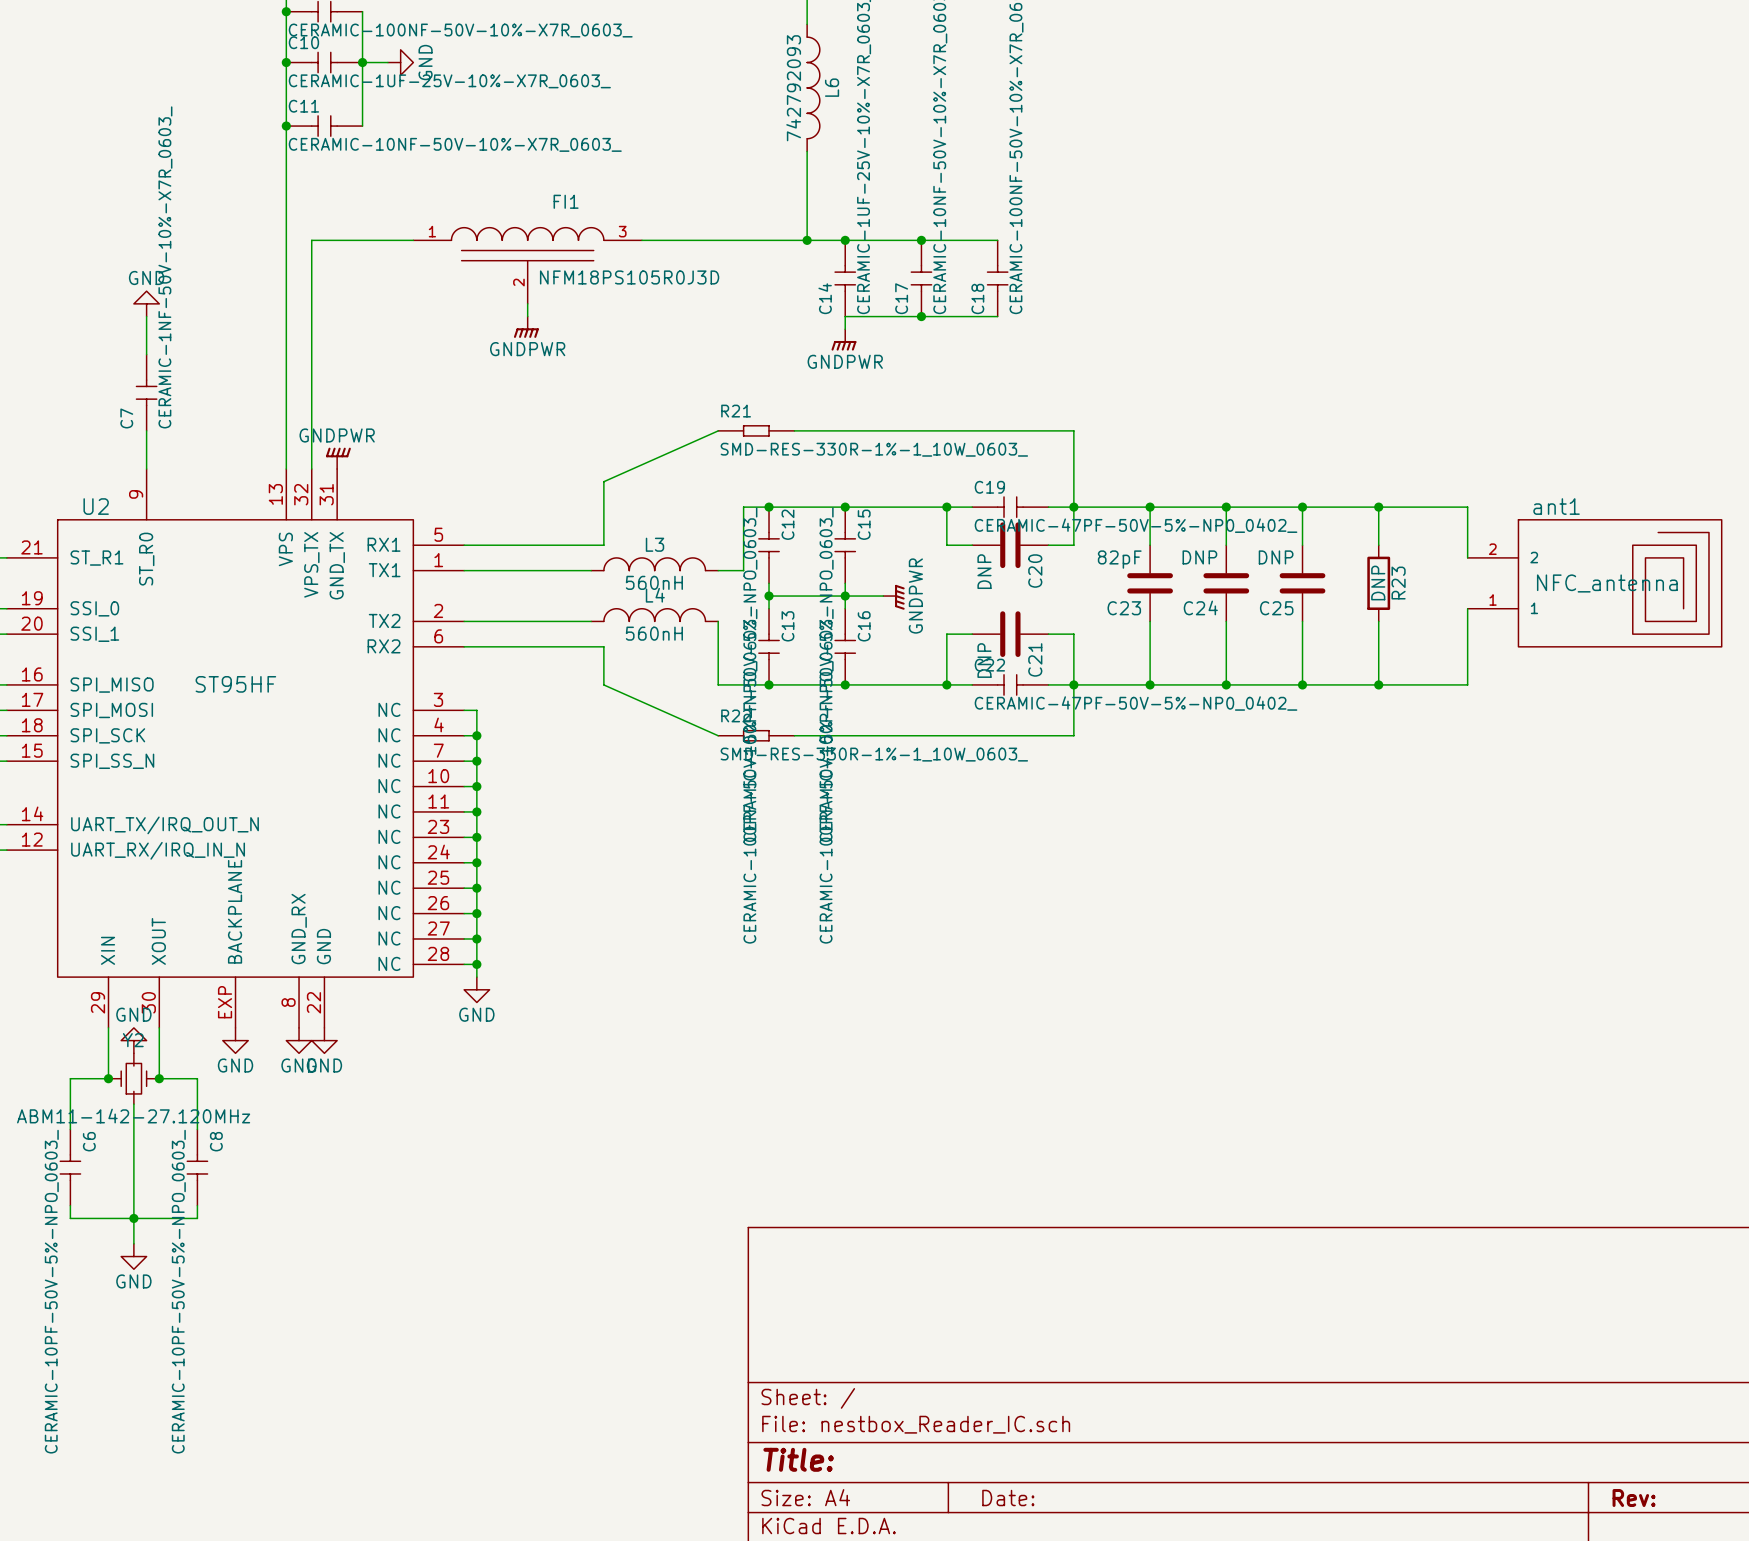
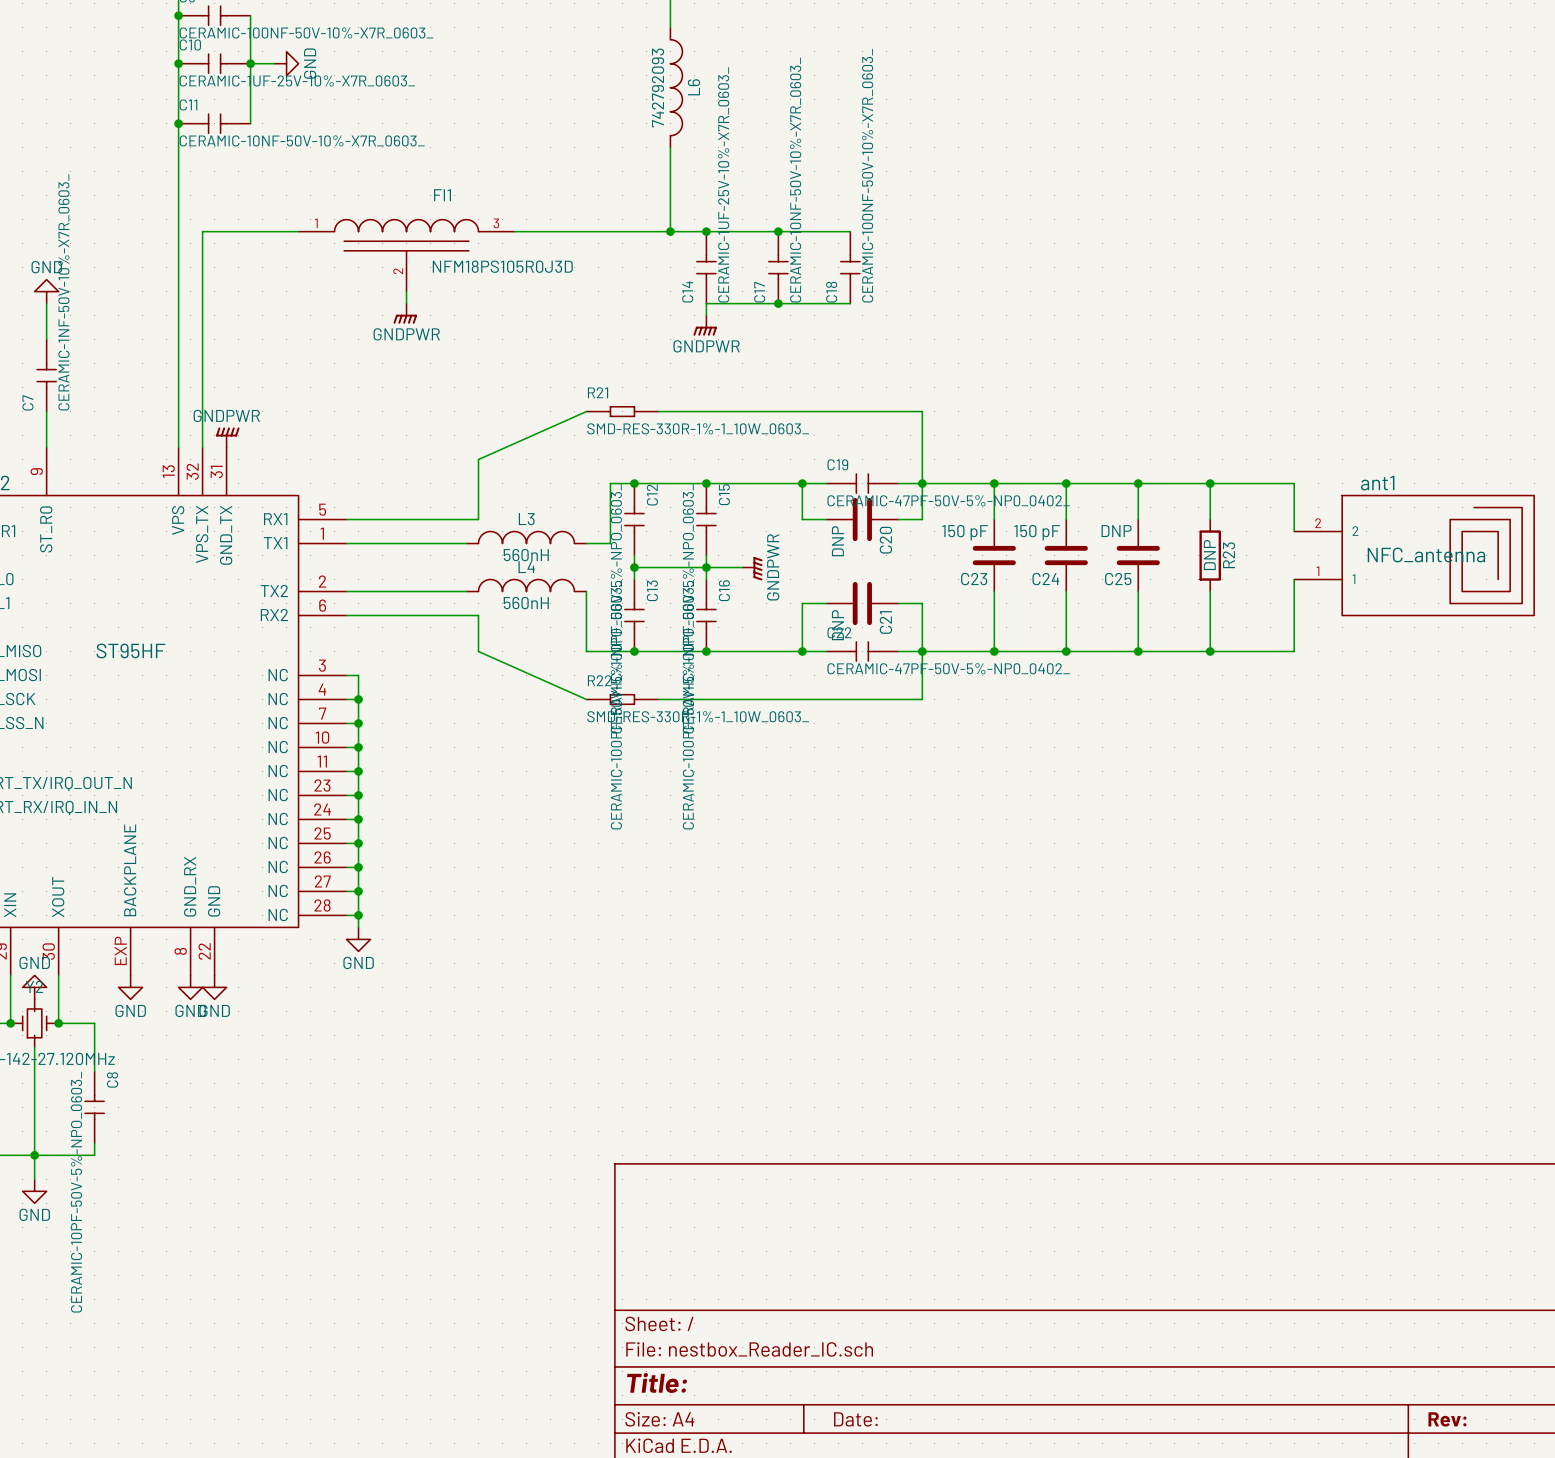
C24 value: DNP (1199, 557) -> 150 pF (1037, 532)
C23 value: 82pF (1119, 559) -> 150 pF (965, 532)

